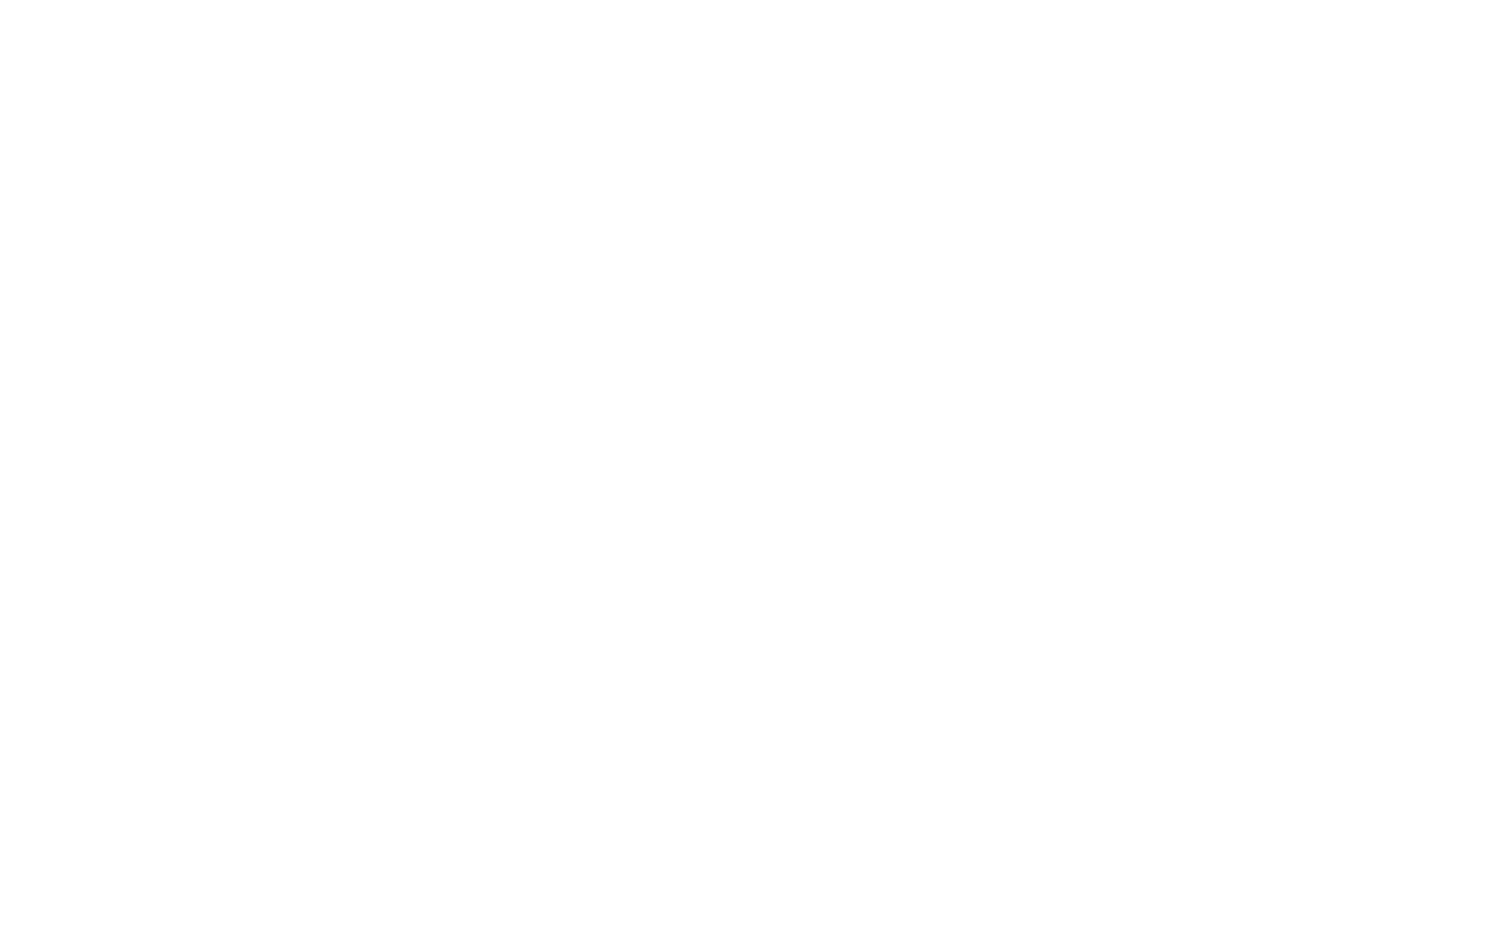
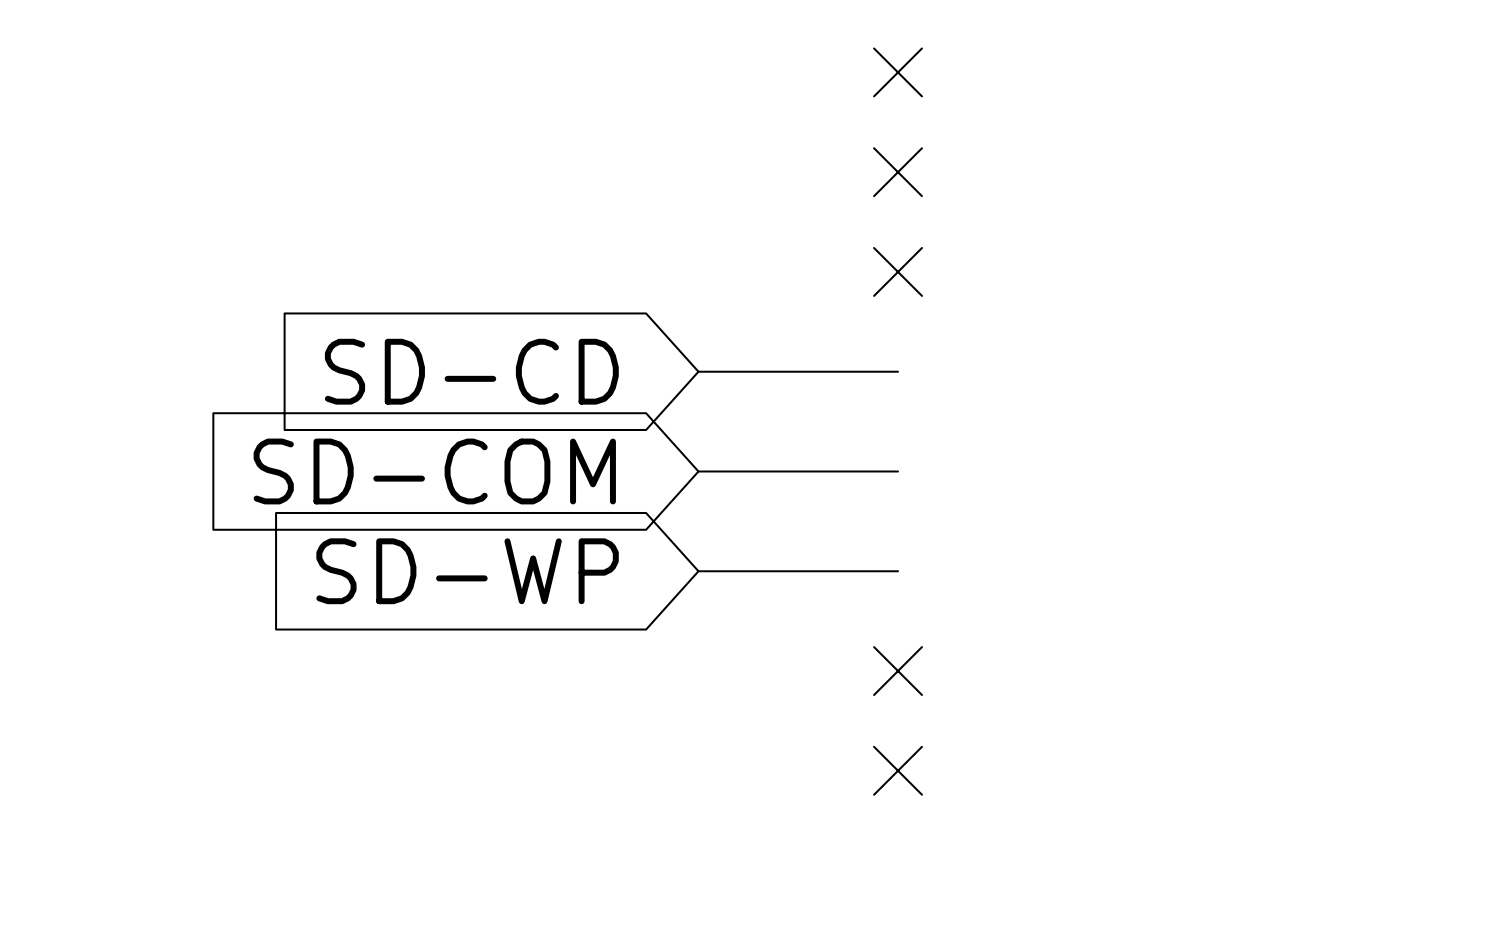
no-connect mark: none -> (898, 72)
no-connect mark: none -> (898, 172)
no-connect mark: none -> (898, 271)
global label: none -> SD-CD (471, 371)
wire: none -> (698, 371) (898, 371)
global label: none -> SD-COM (434, 471)
wire: none -> (698, 471) (898, 471)
global label: none -> SD-WP (467, 571)
wire: none -> (698, 571) (898, 571)
no-connect mark: none -> (898, 671)
no-connect mark: none -> (898, 770)

